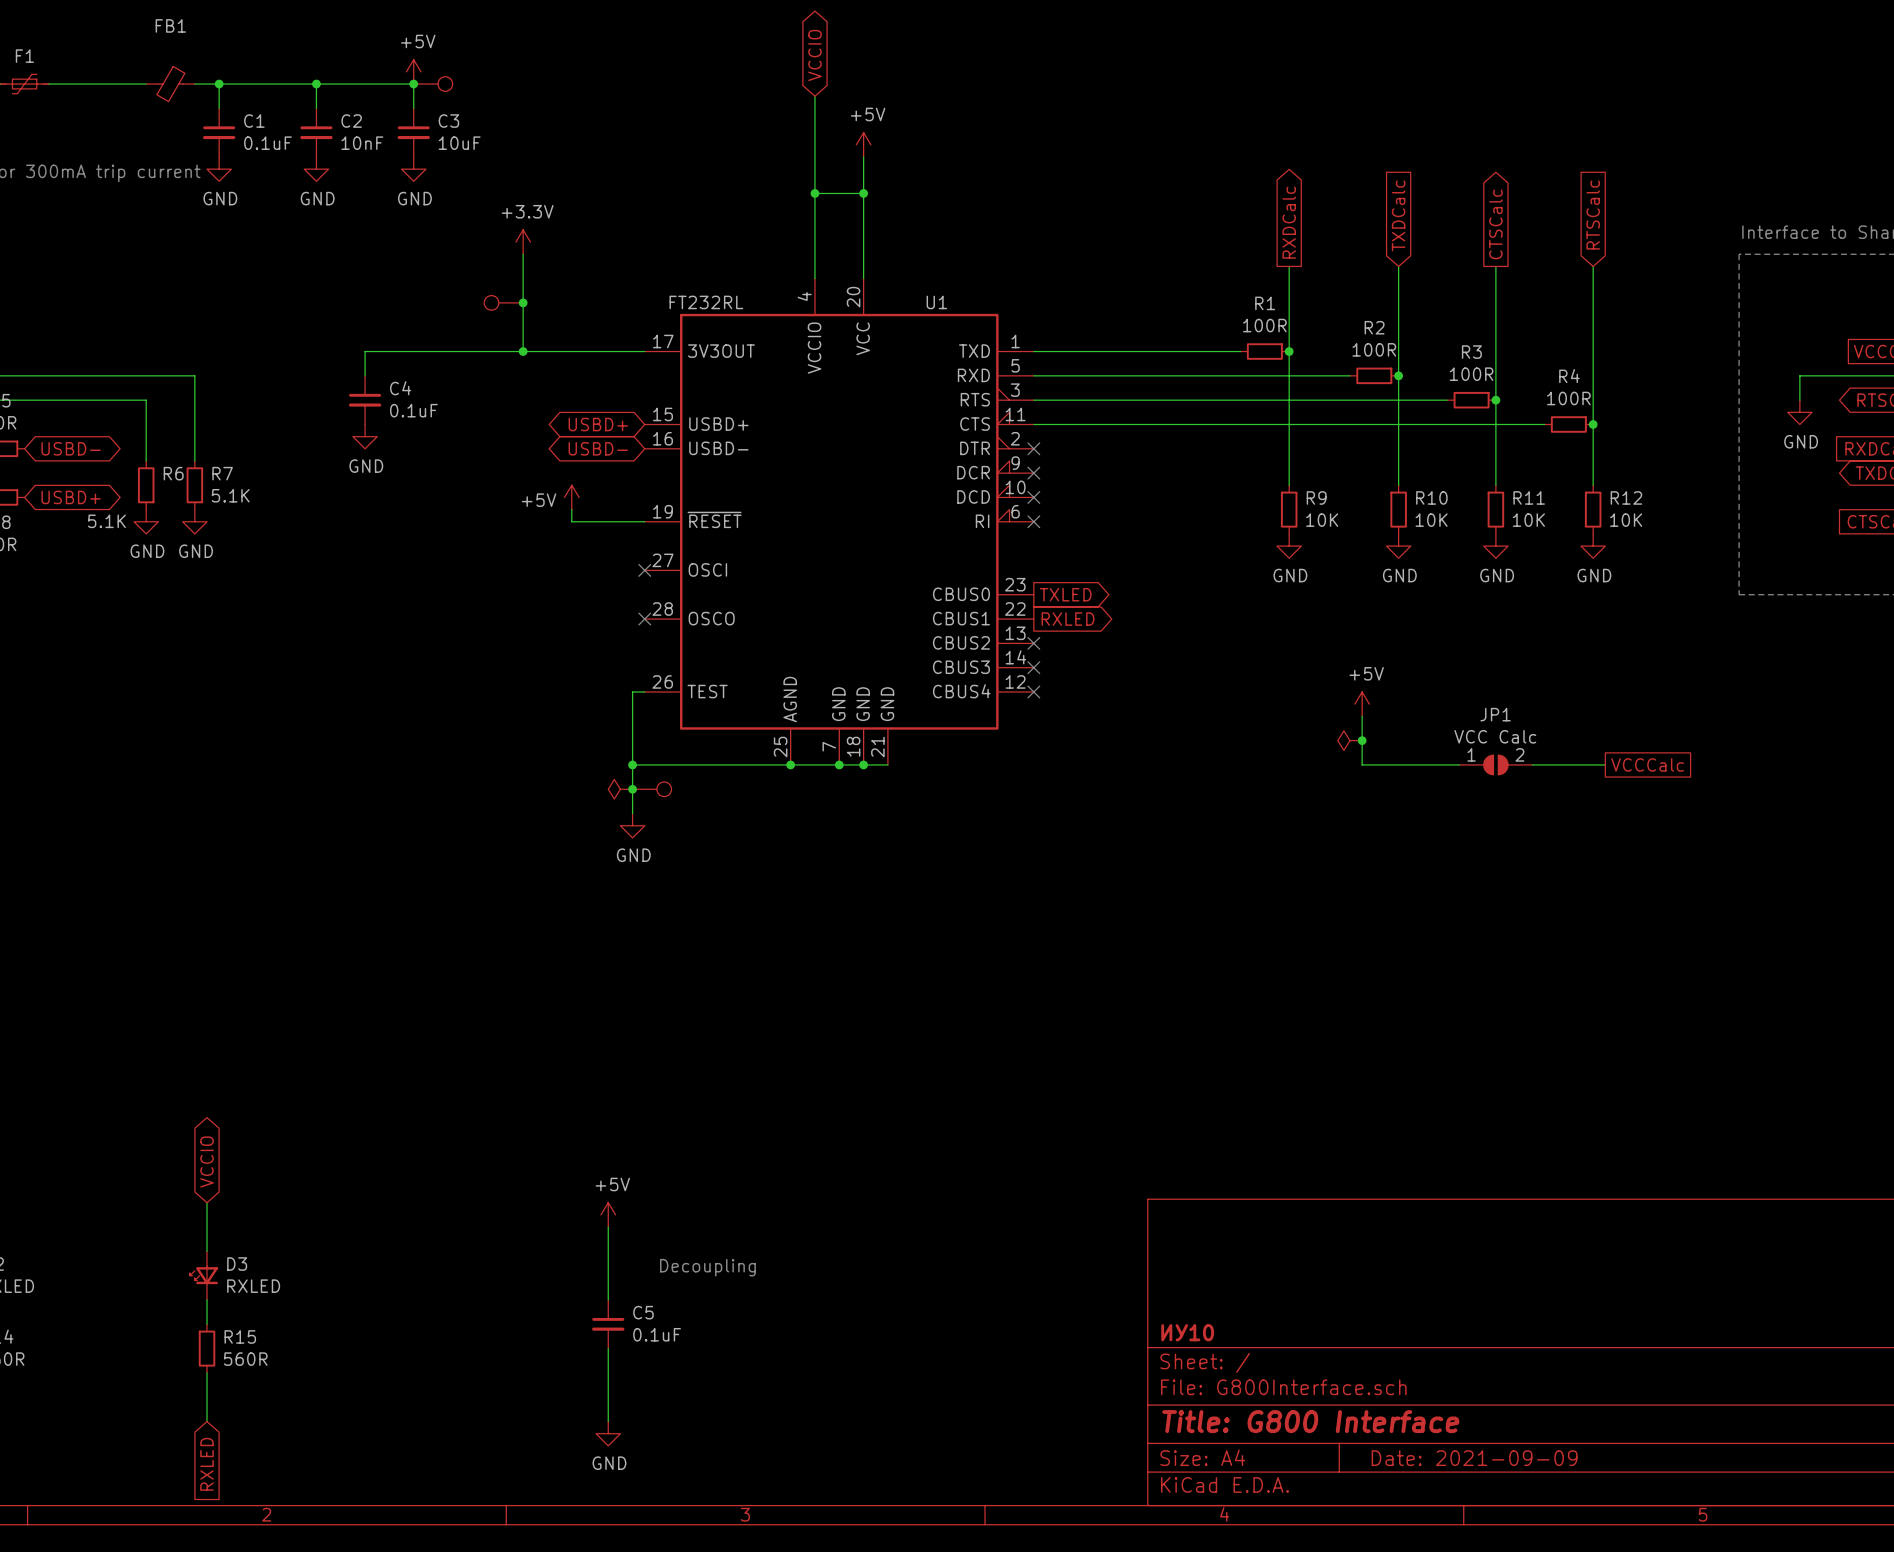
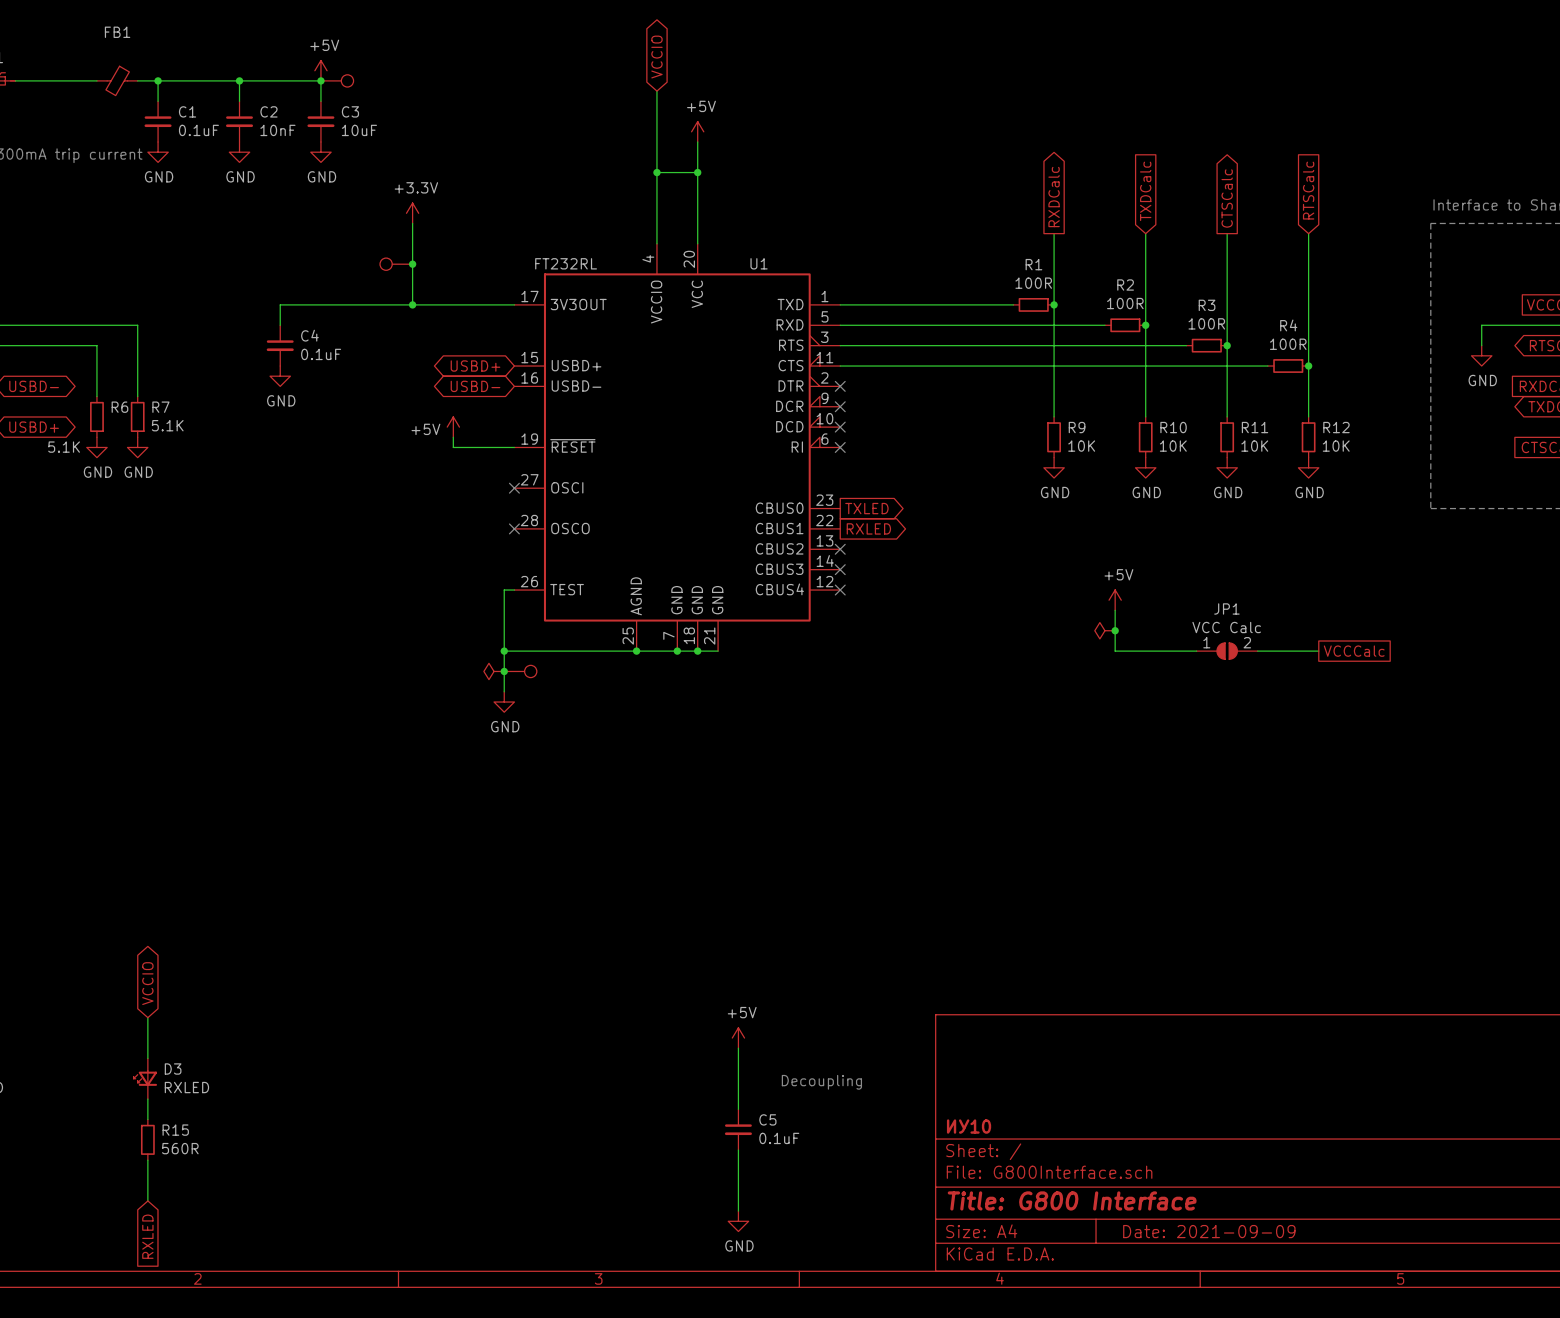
power symbol: +5V (608, 1214) -> none
wire: (608, 1227) (608, 1299) -> none
power symbol: none -> +5V (738, 1038)
wire: none -> (738, 1048) (738, 1109)
text: Decoupling (707, 1267) -> none
text: none -> Decoupling (821, 1082)
C5 position: (608, 1324) -> (738, 1129)
wire: (608, 1348) (608, 1421) -> none
wire: none -> (738, 1150) (738, 1211)
power symbol: GND (608, 1433) -> none
power symbol: none -> GND (738, 1221)

